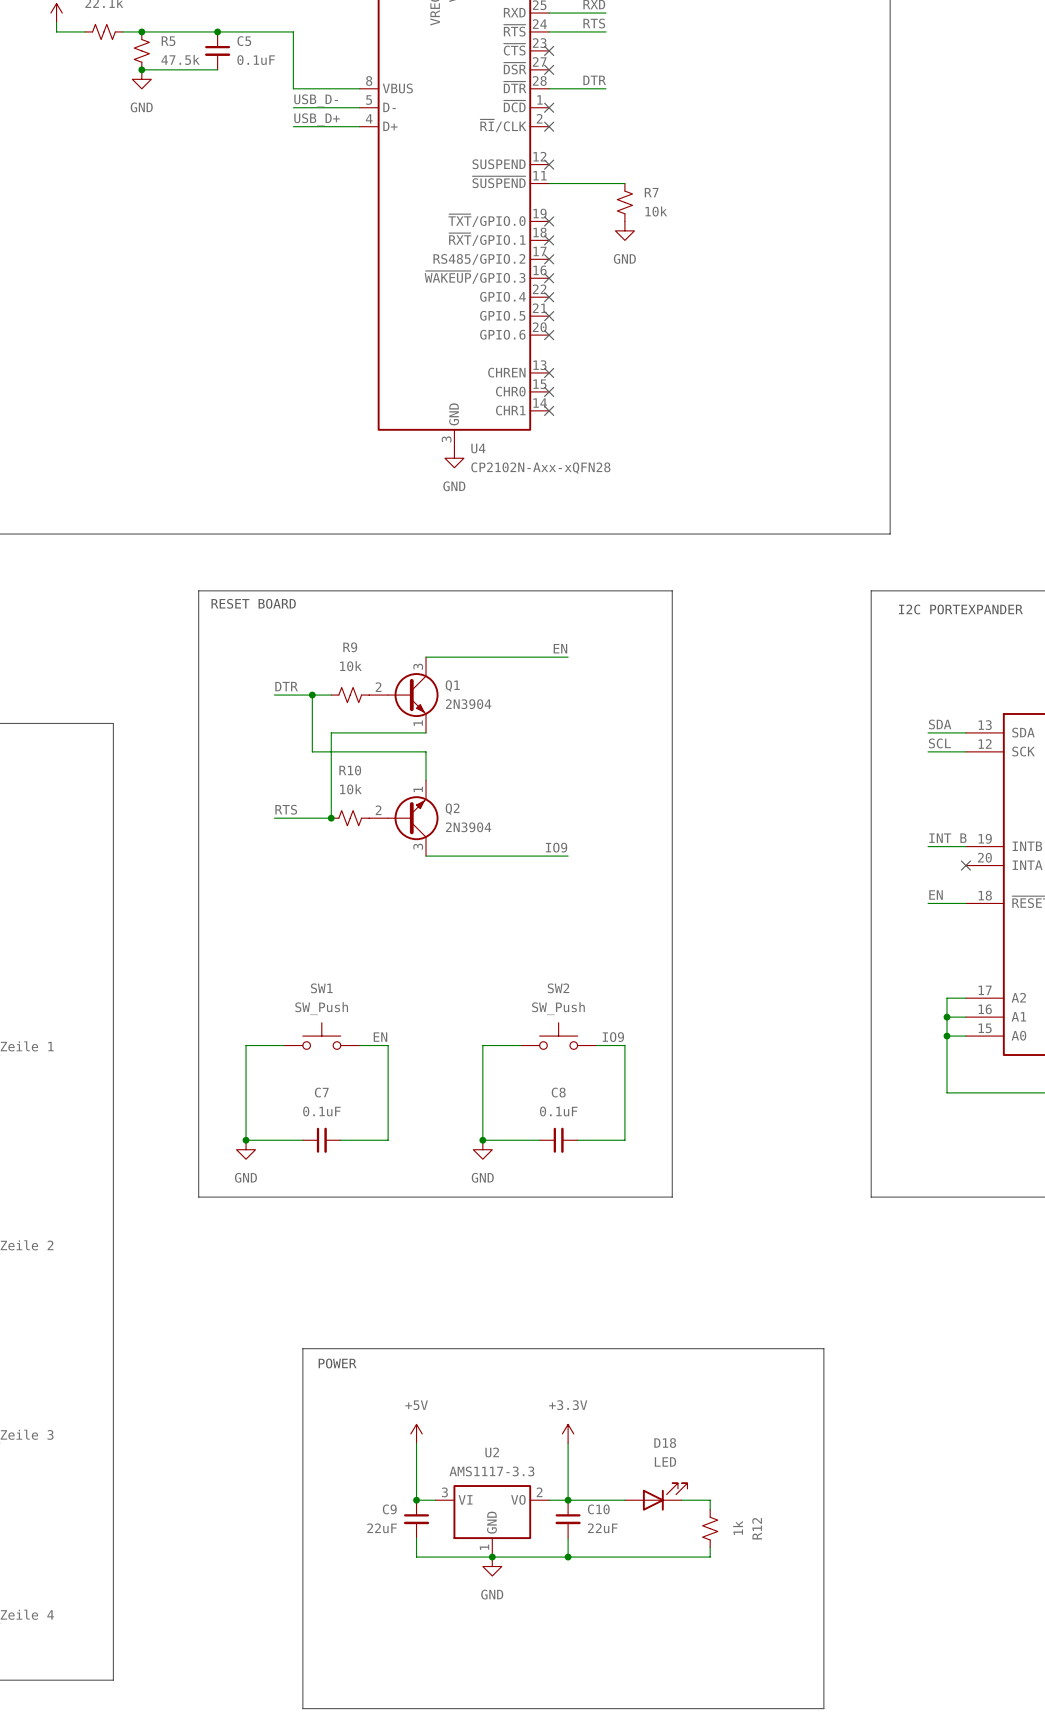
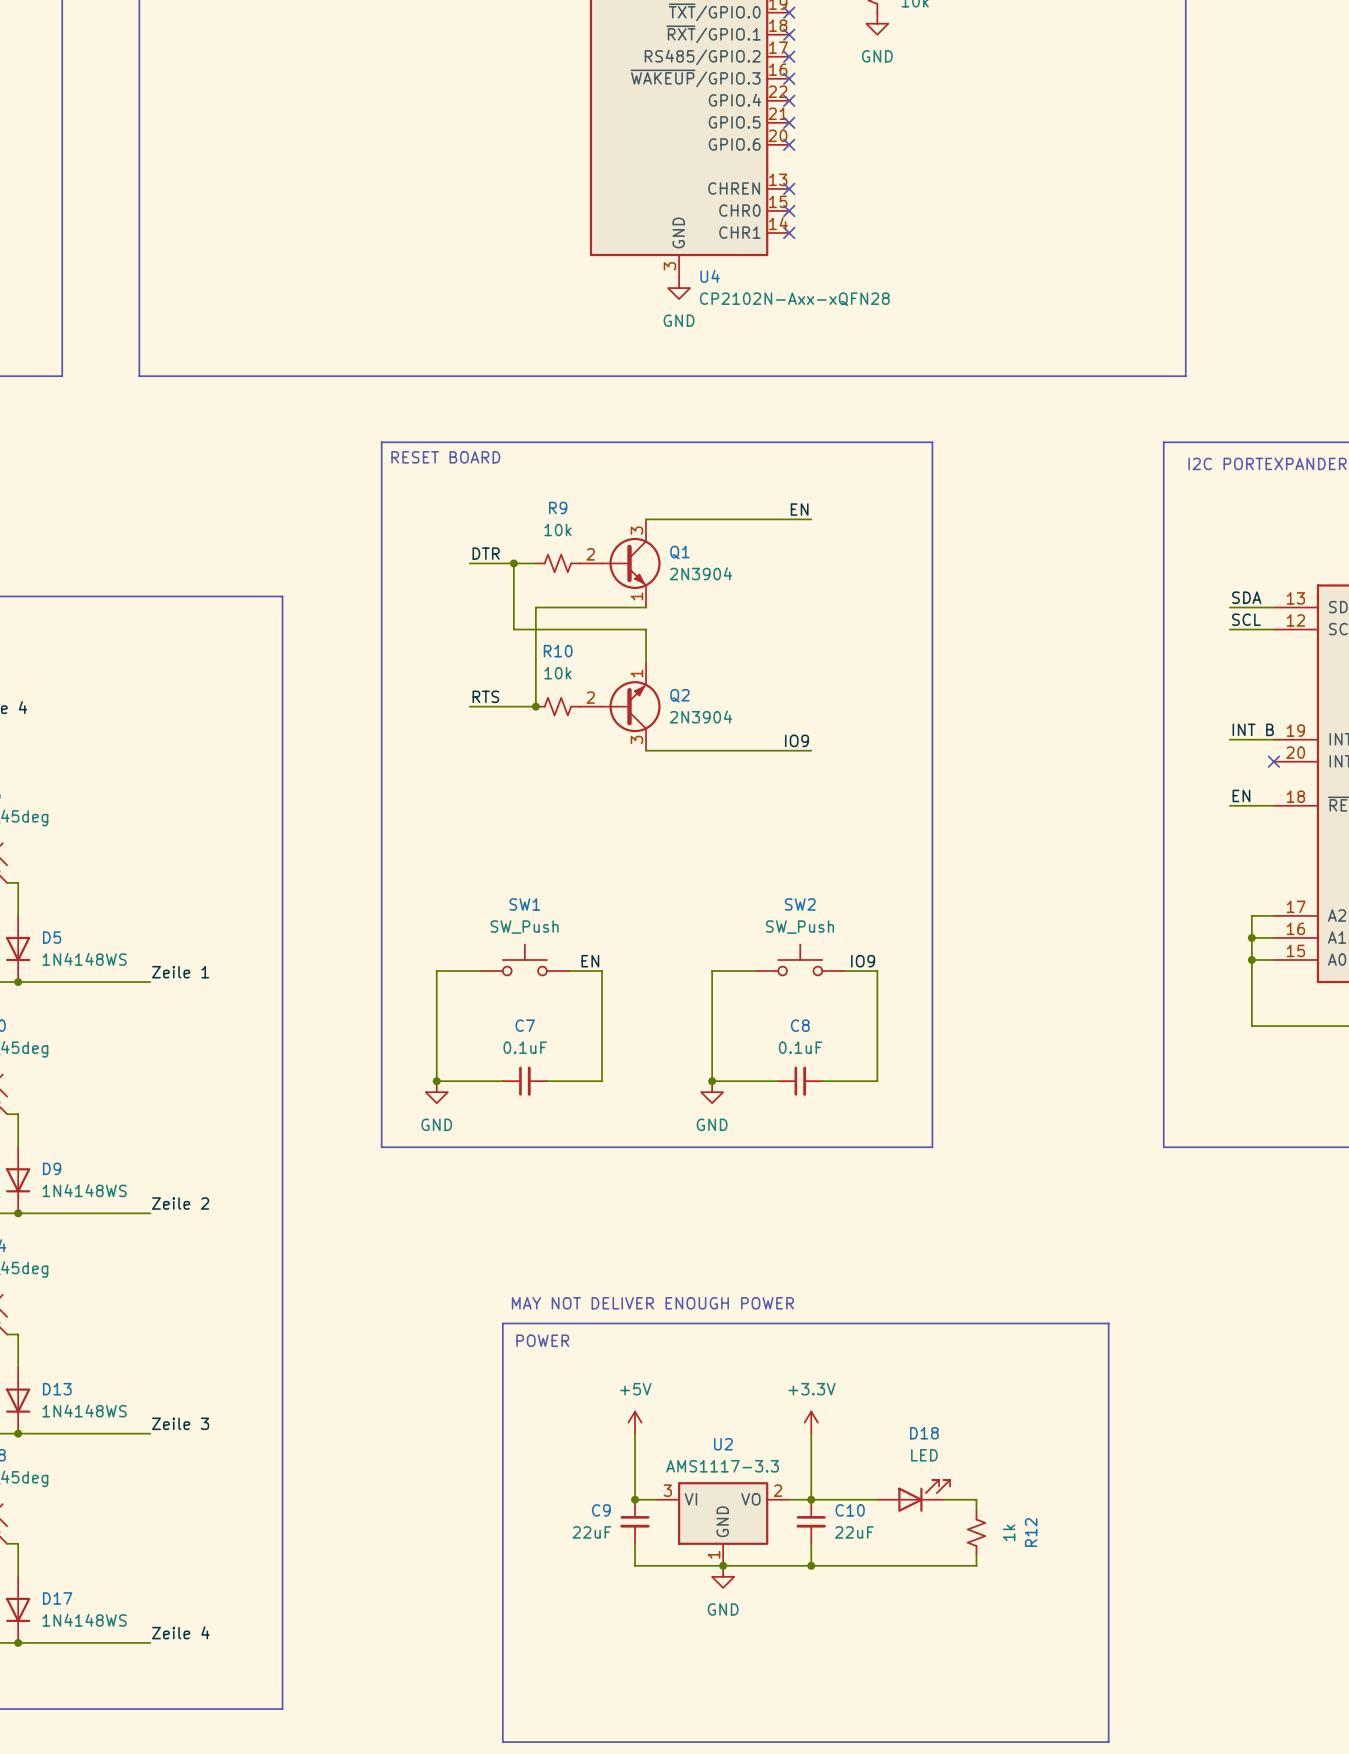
text: none -> MAY NOT DELIVER ENOUGH POWER (652, 1303)

